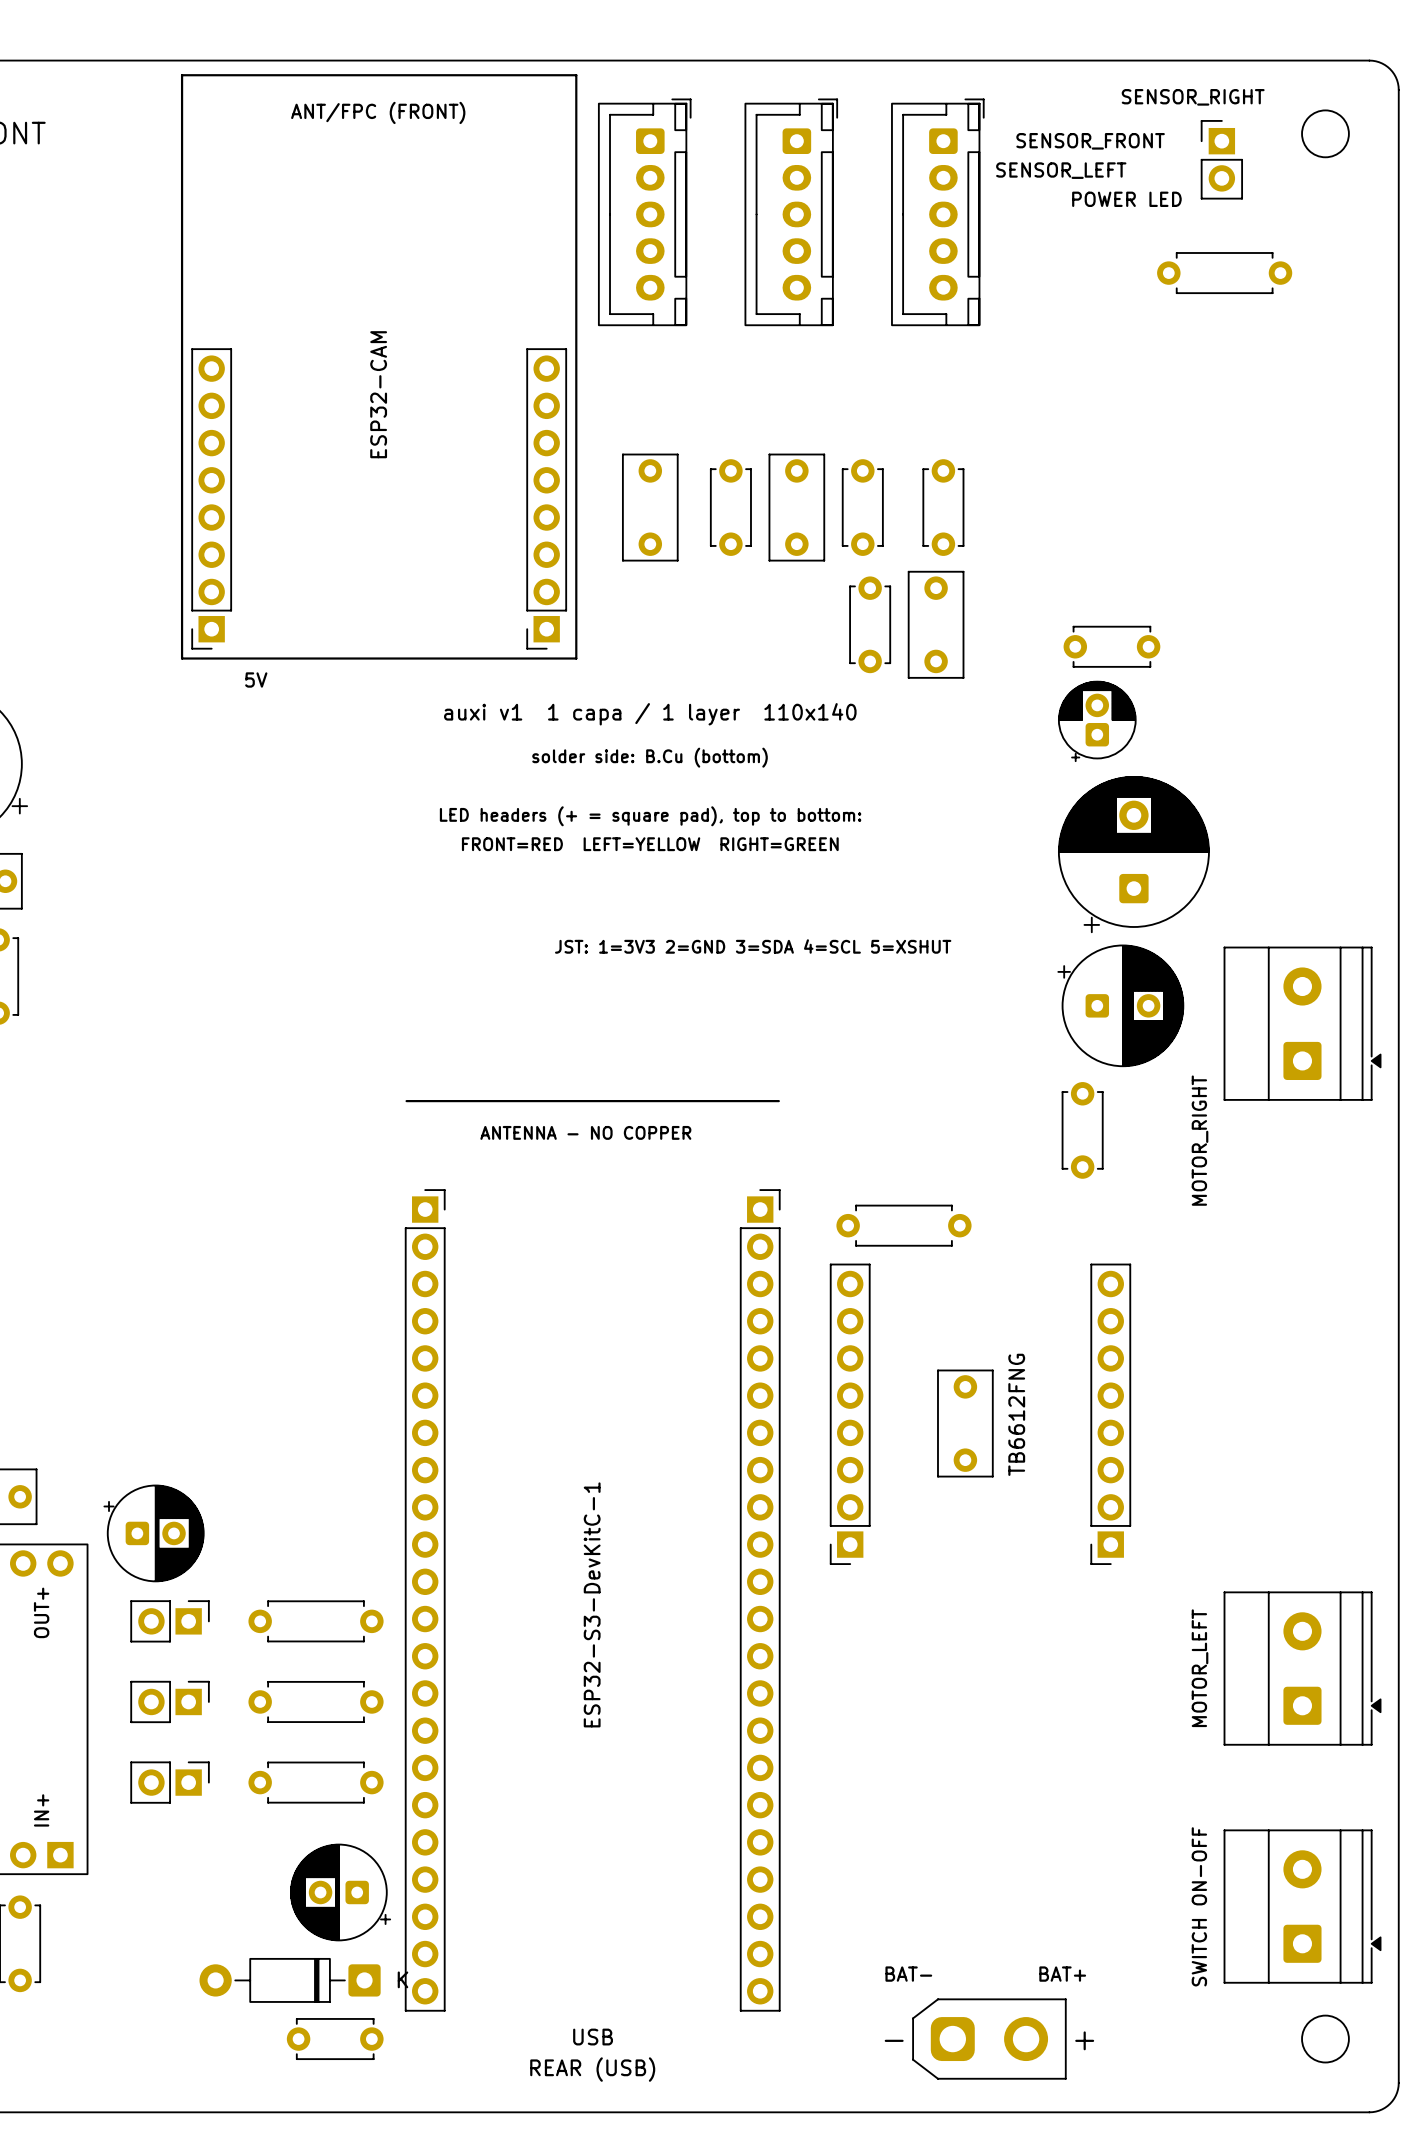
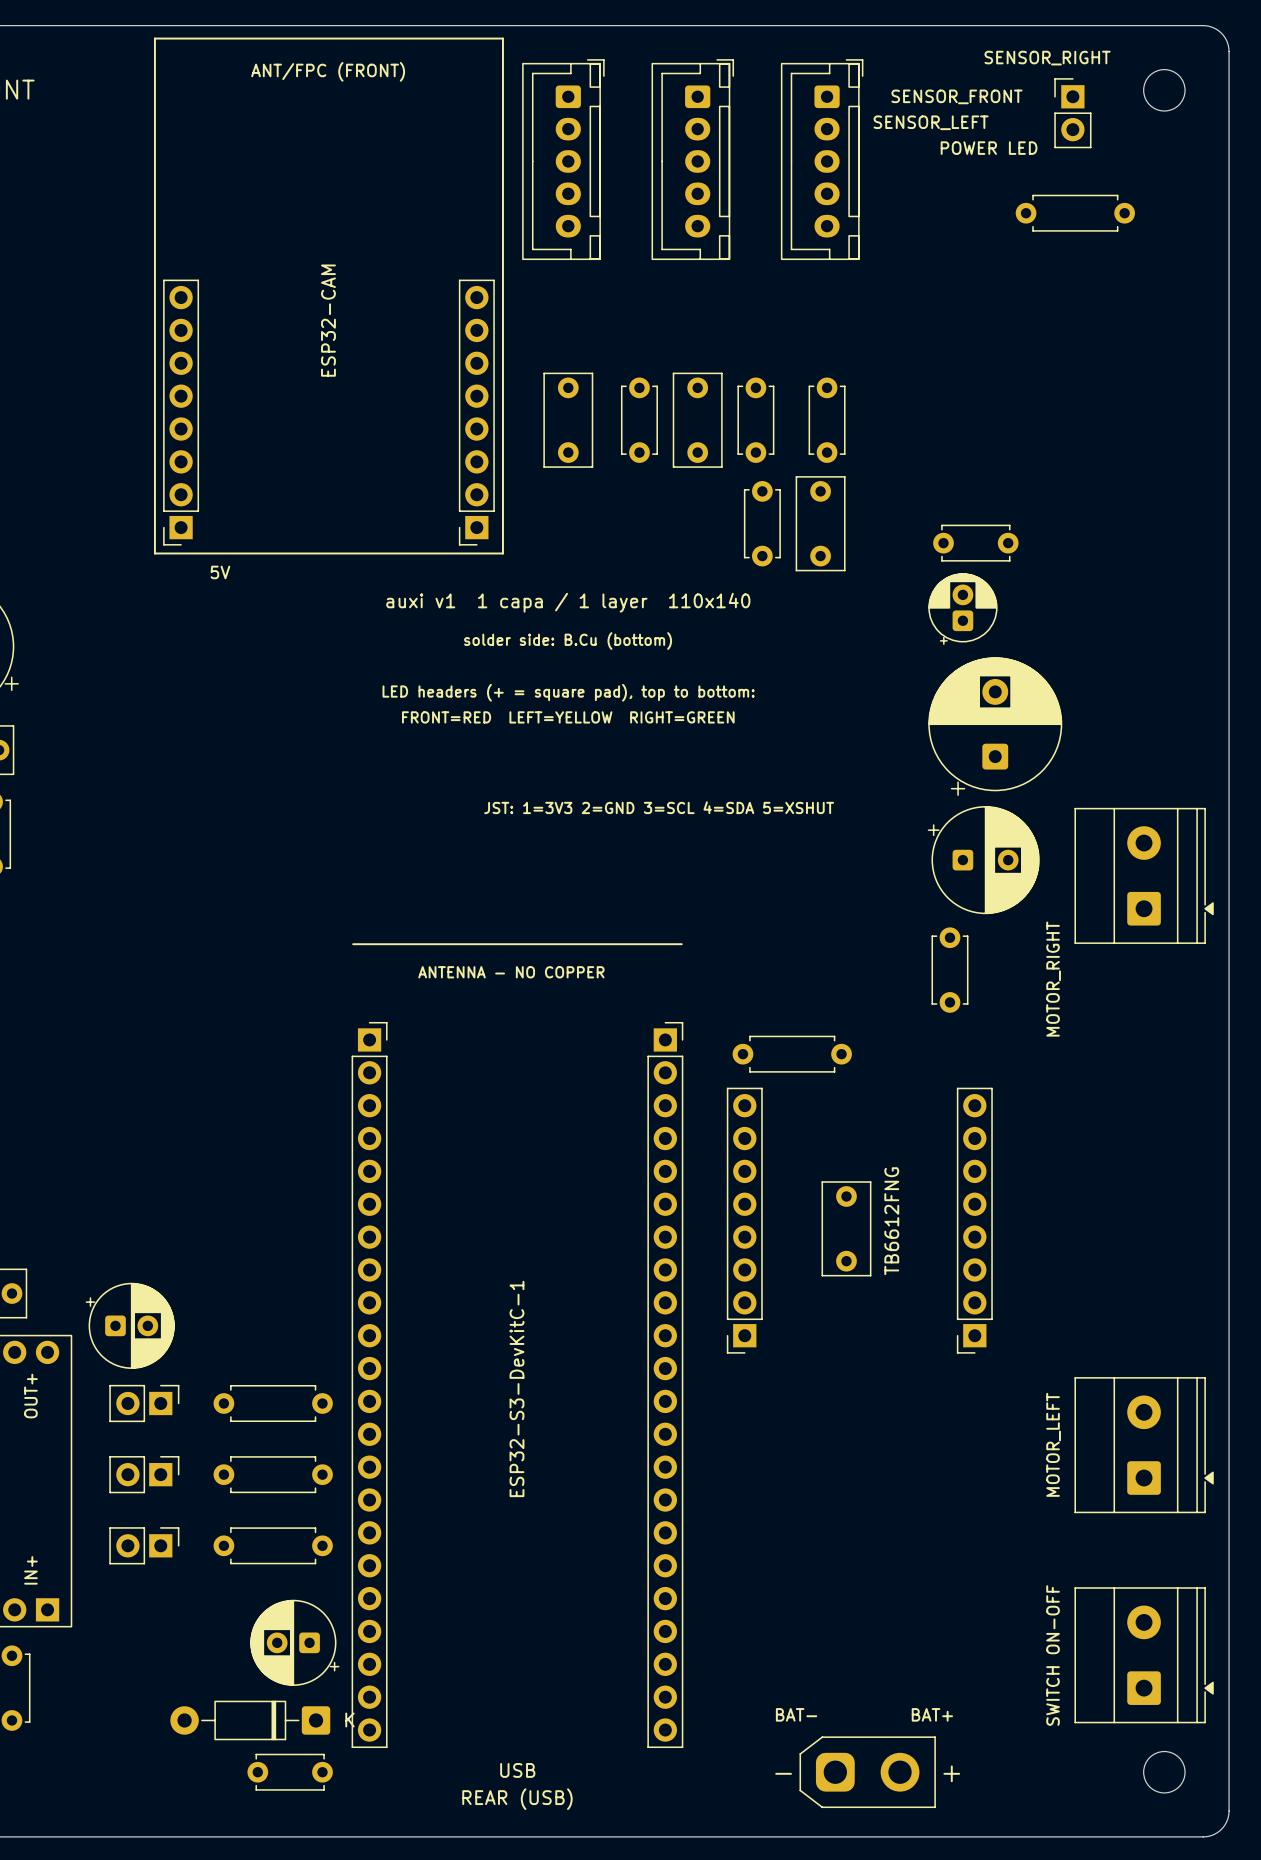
text: JST: 1=3V3 2=GND 3=SDA 4=SCL 5=XSHUT (753, 946) -> JST: 1=3V3 2=GND 3=SCL 4=SDA 5=XSHUT (659, 807)

